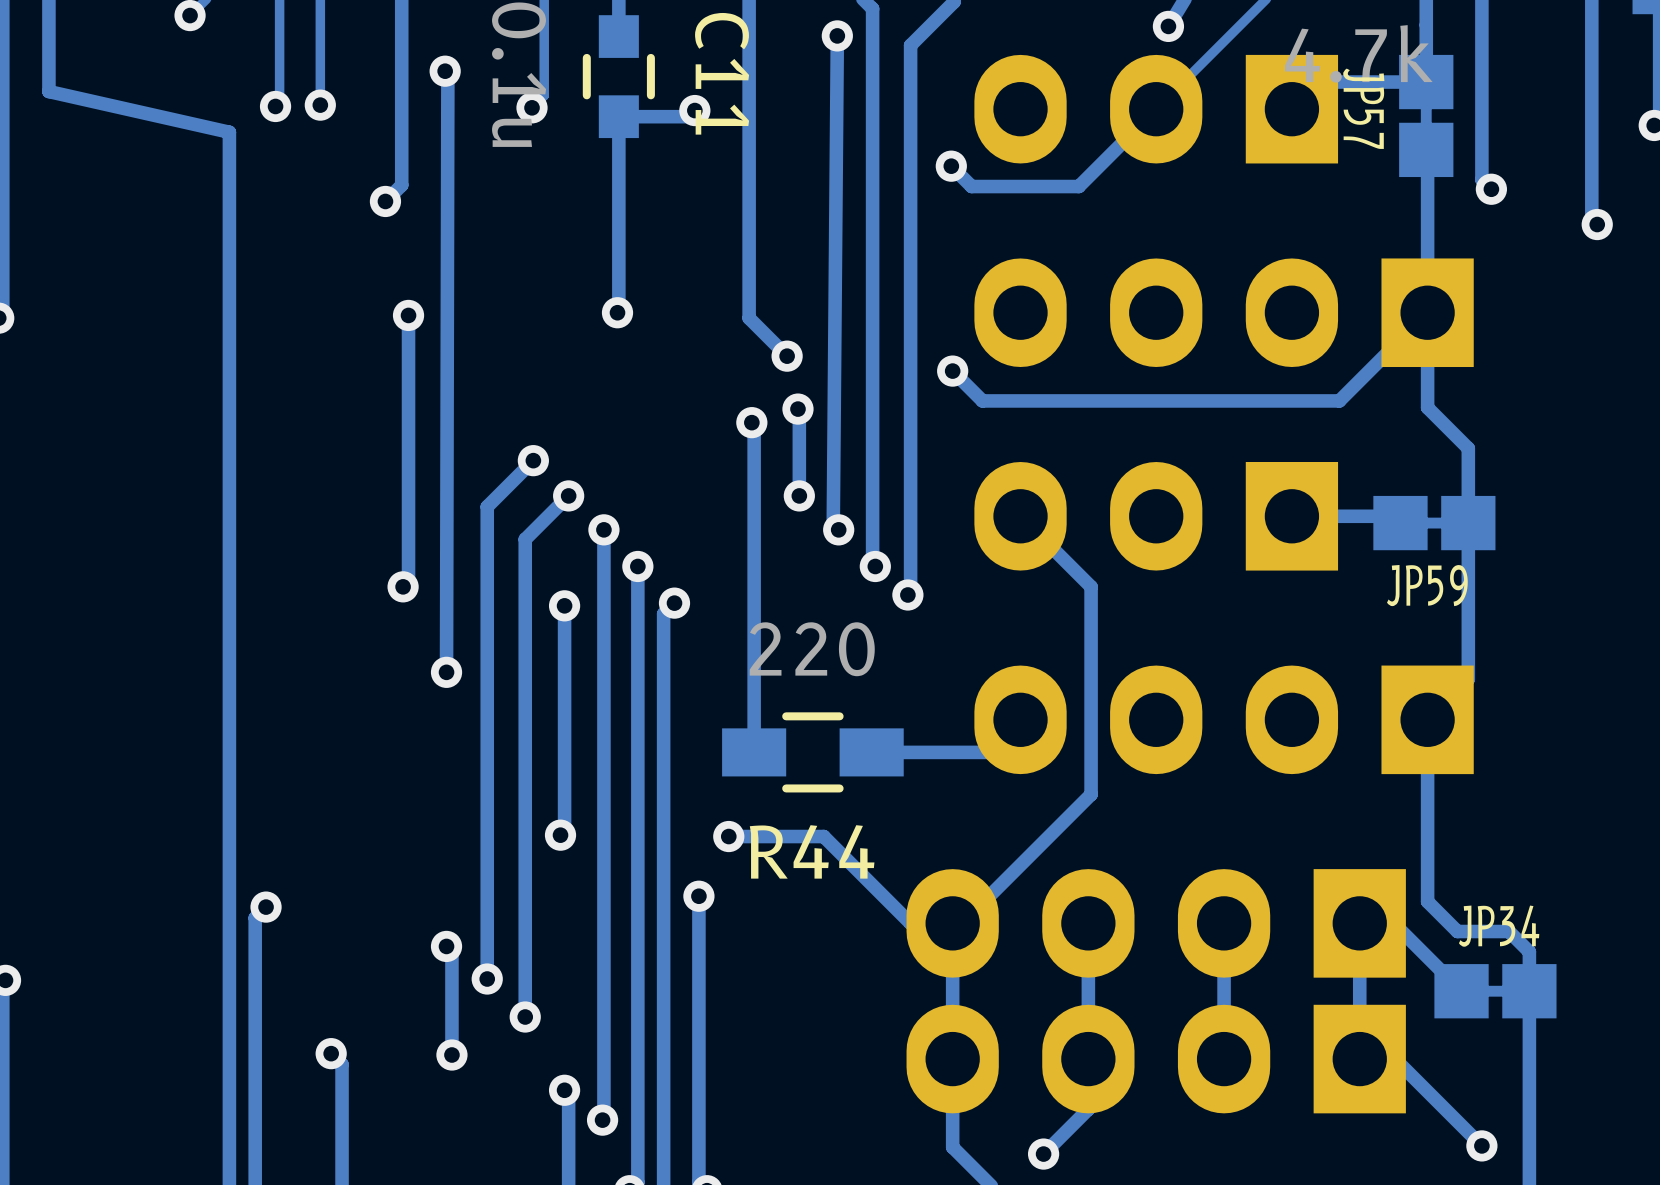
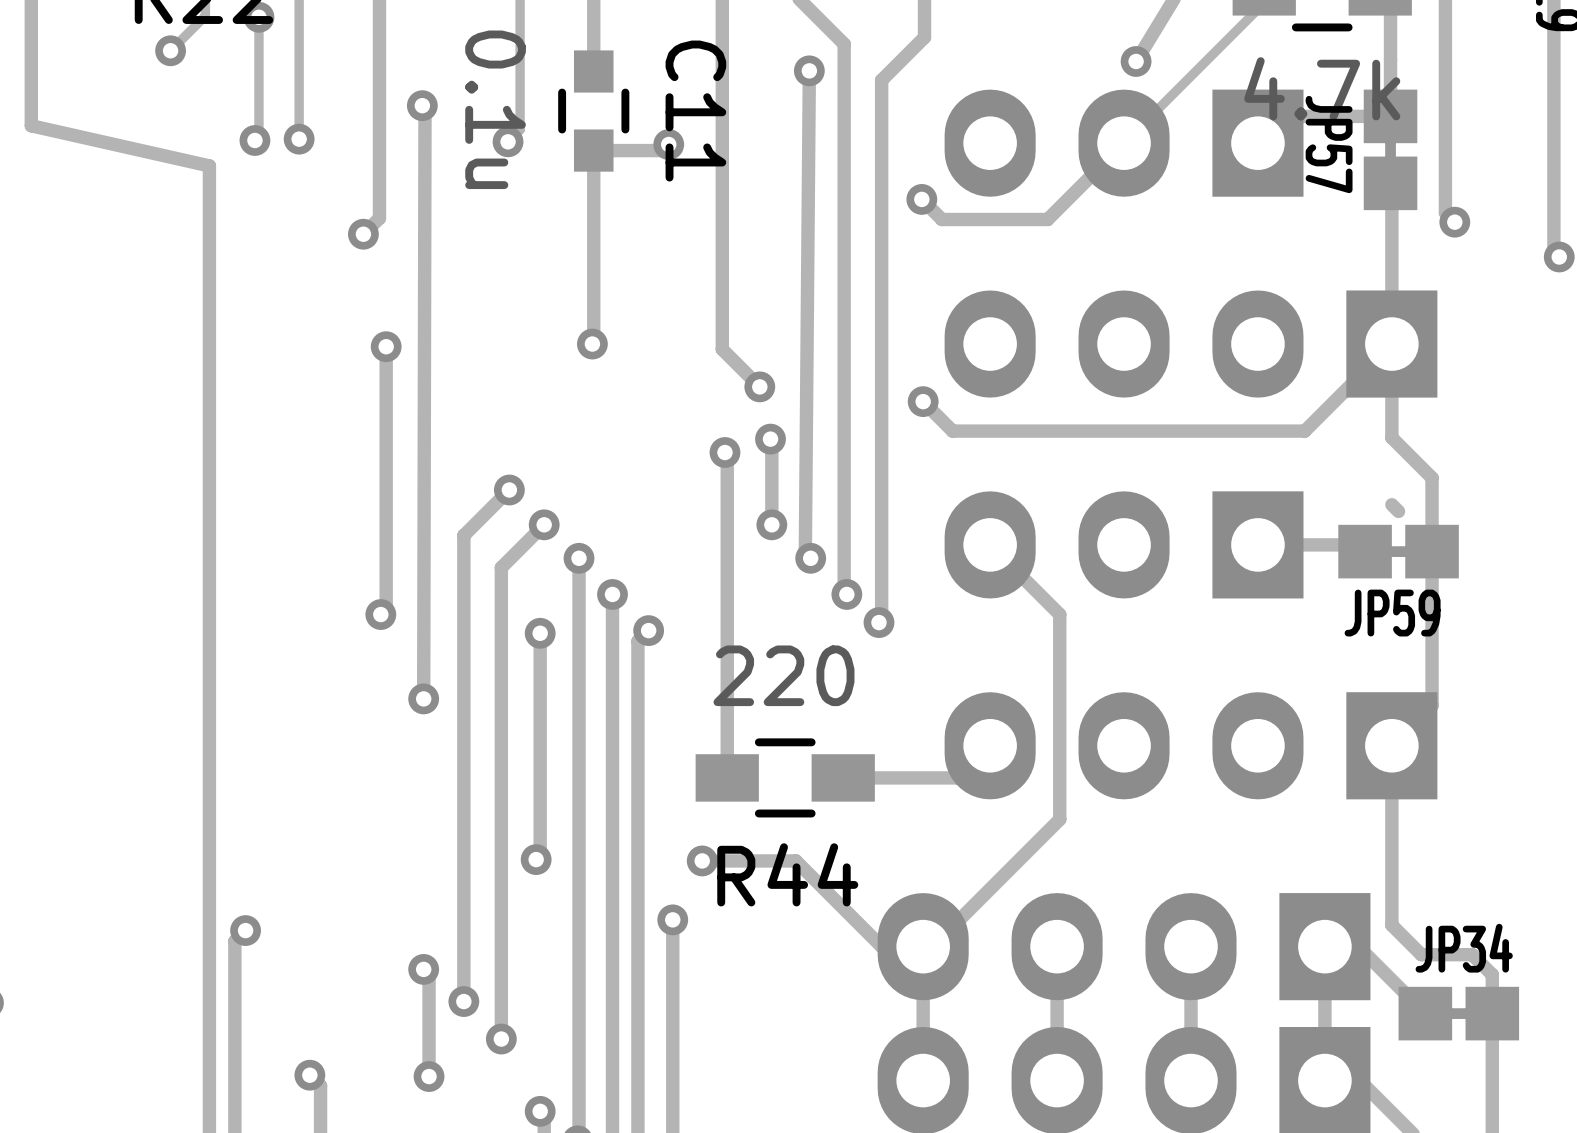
track: none -> (1391, 504) (1398, 511)

